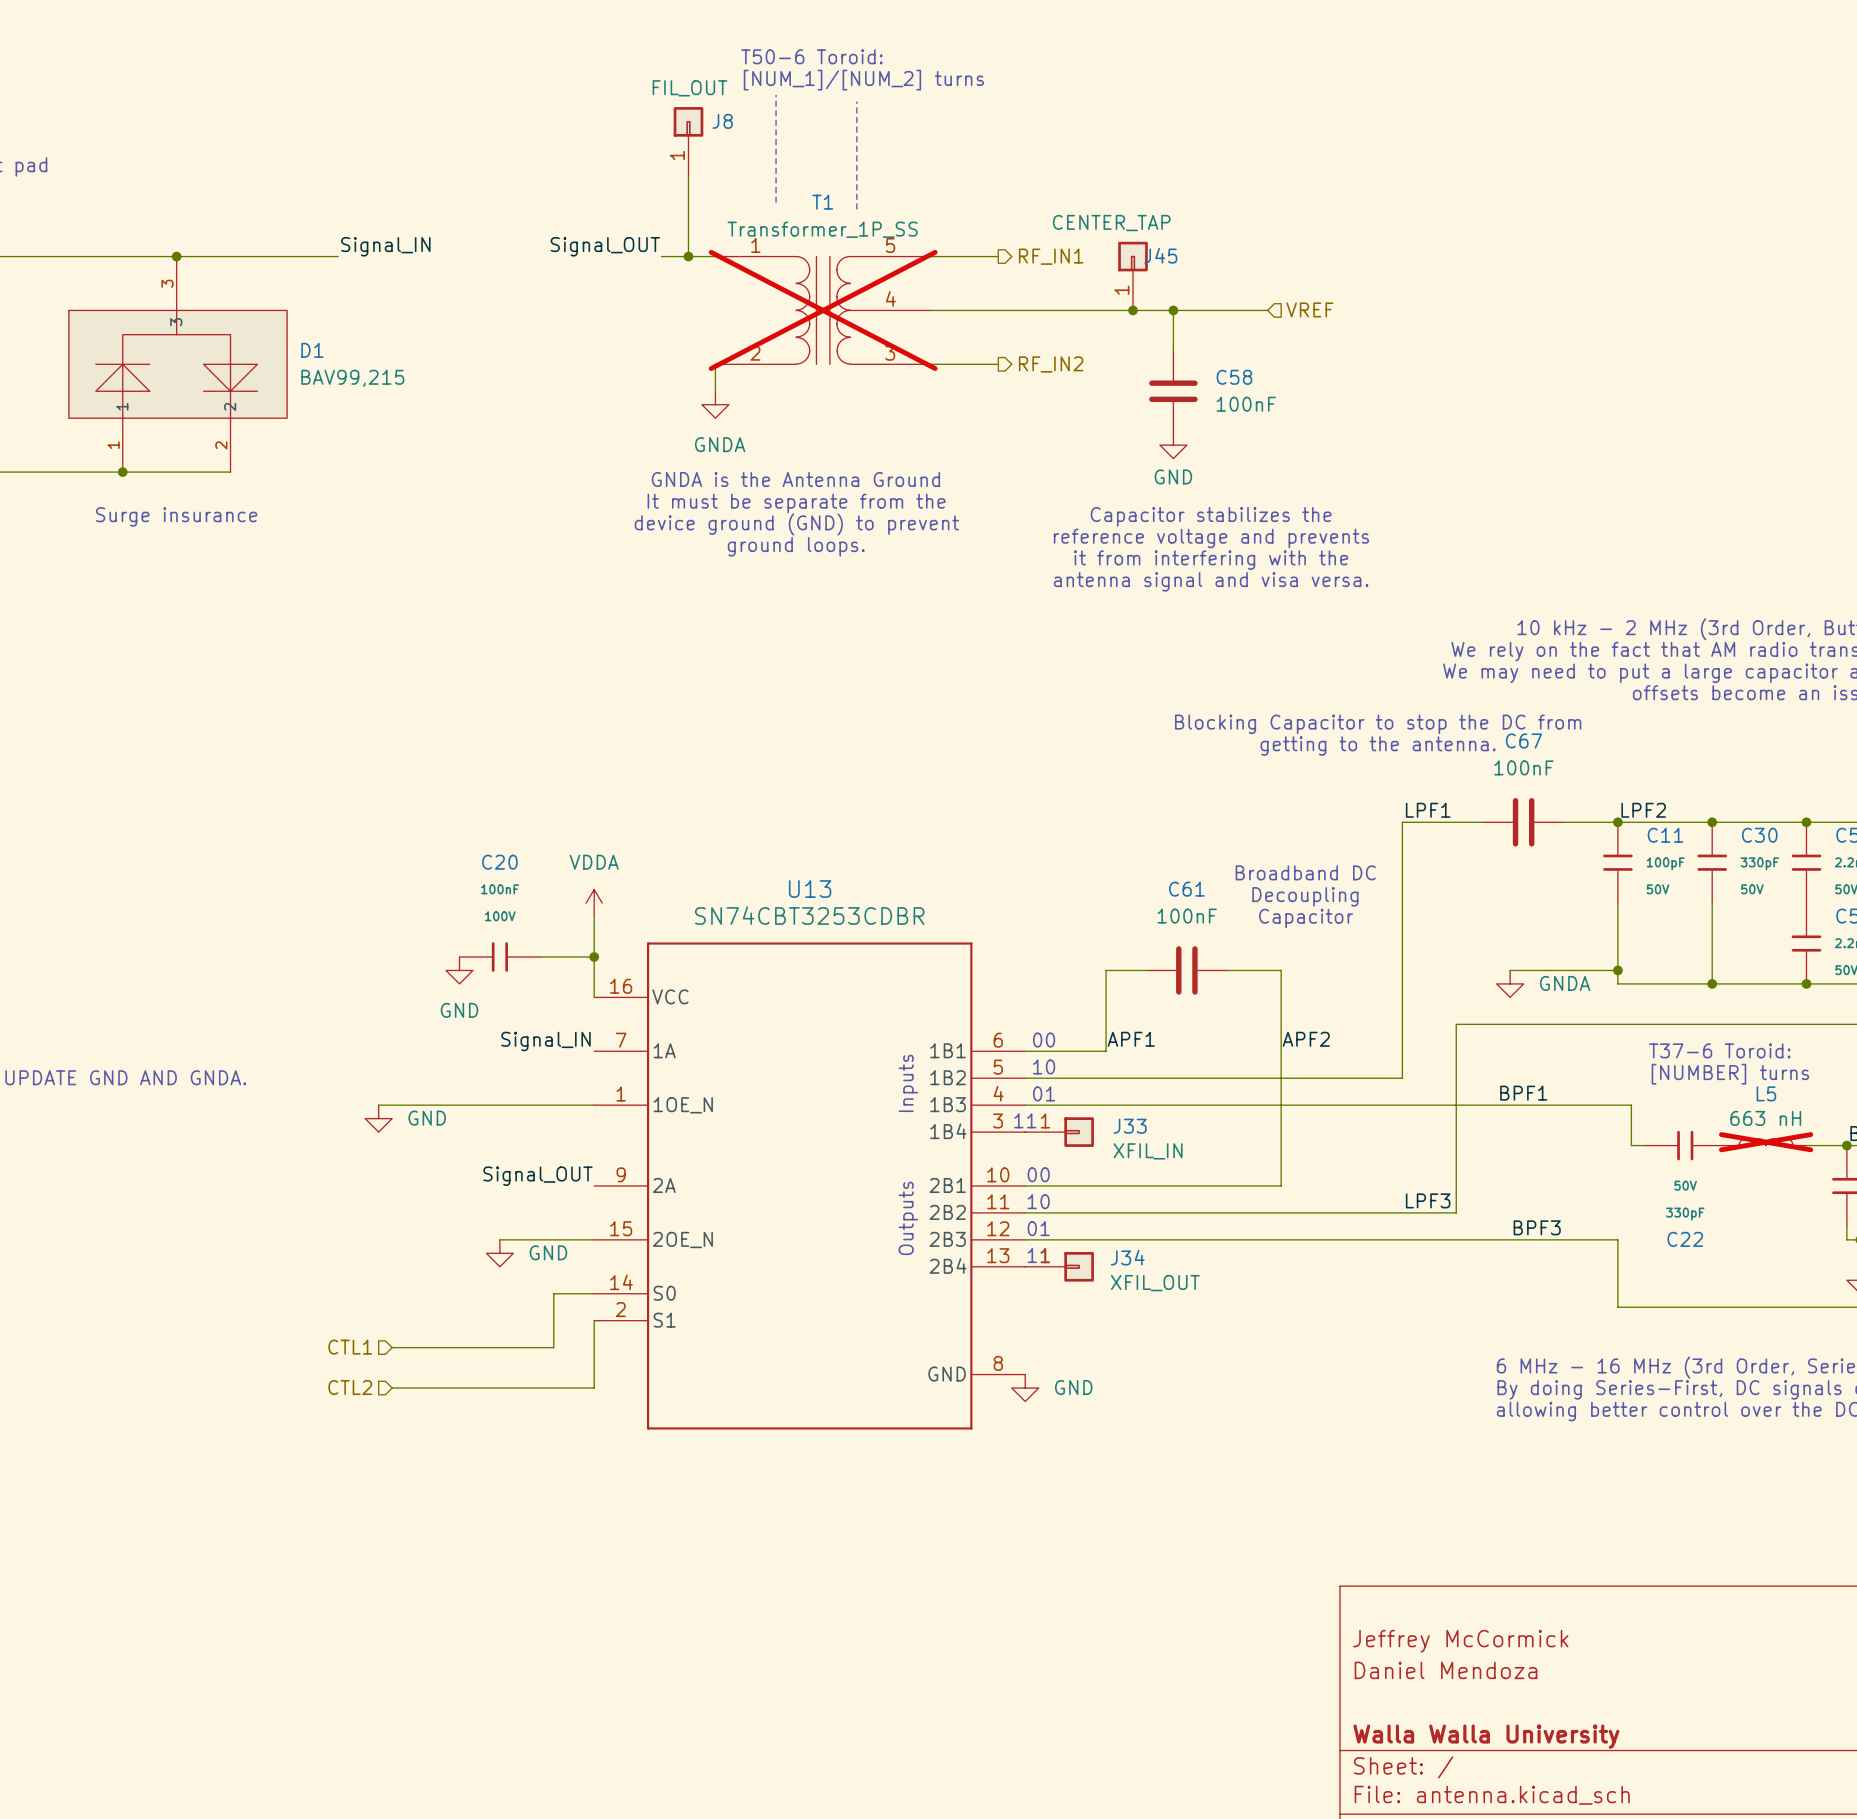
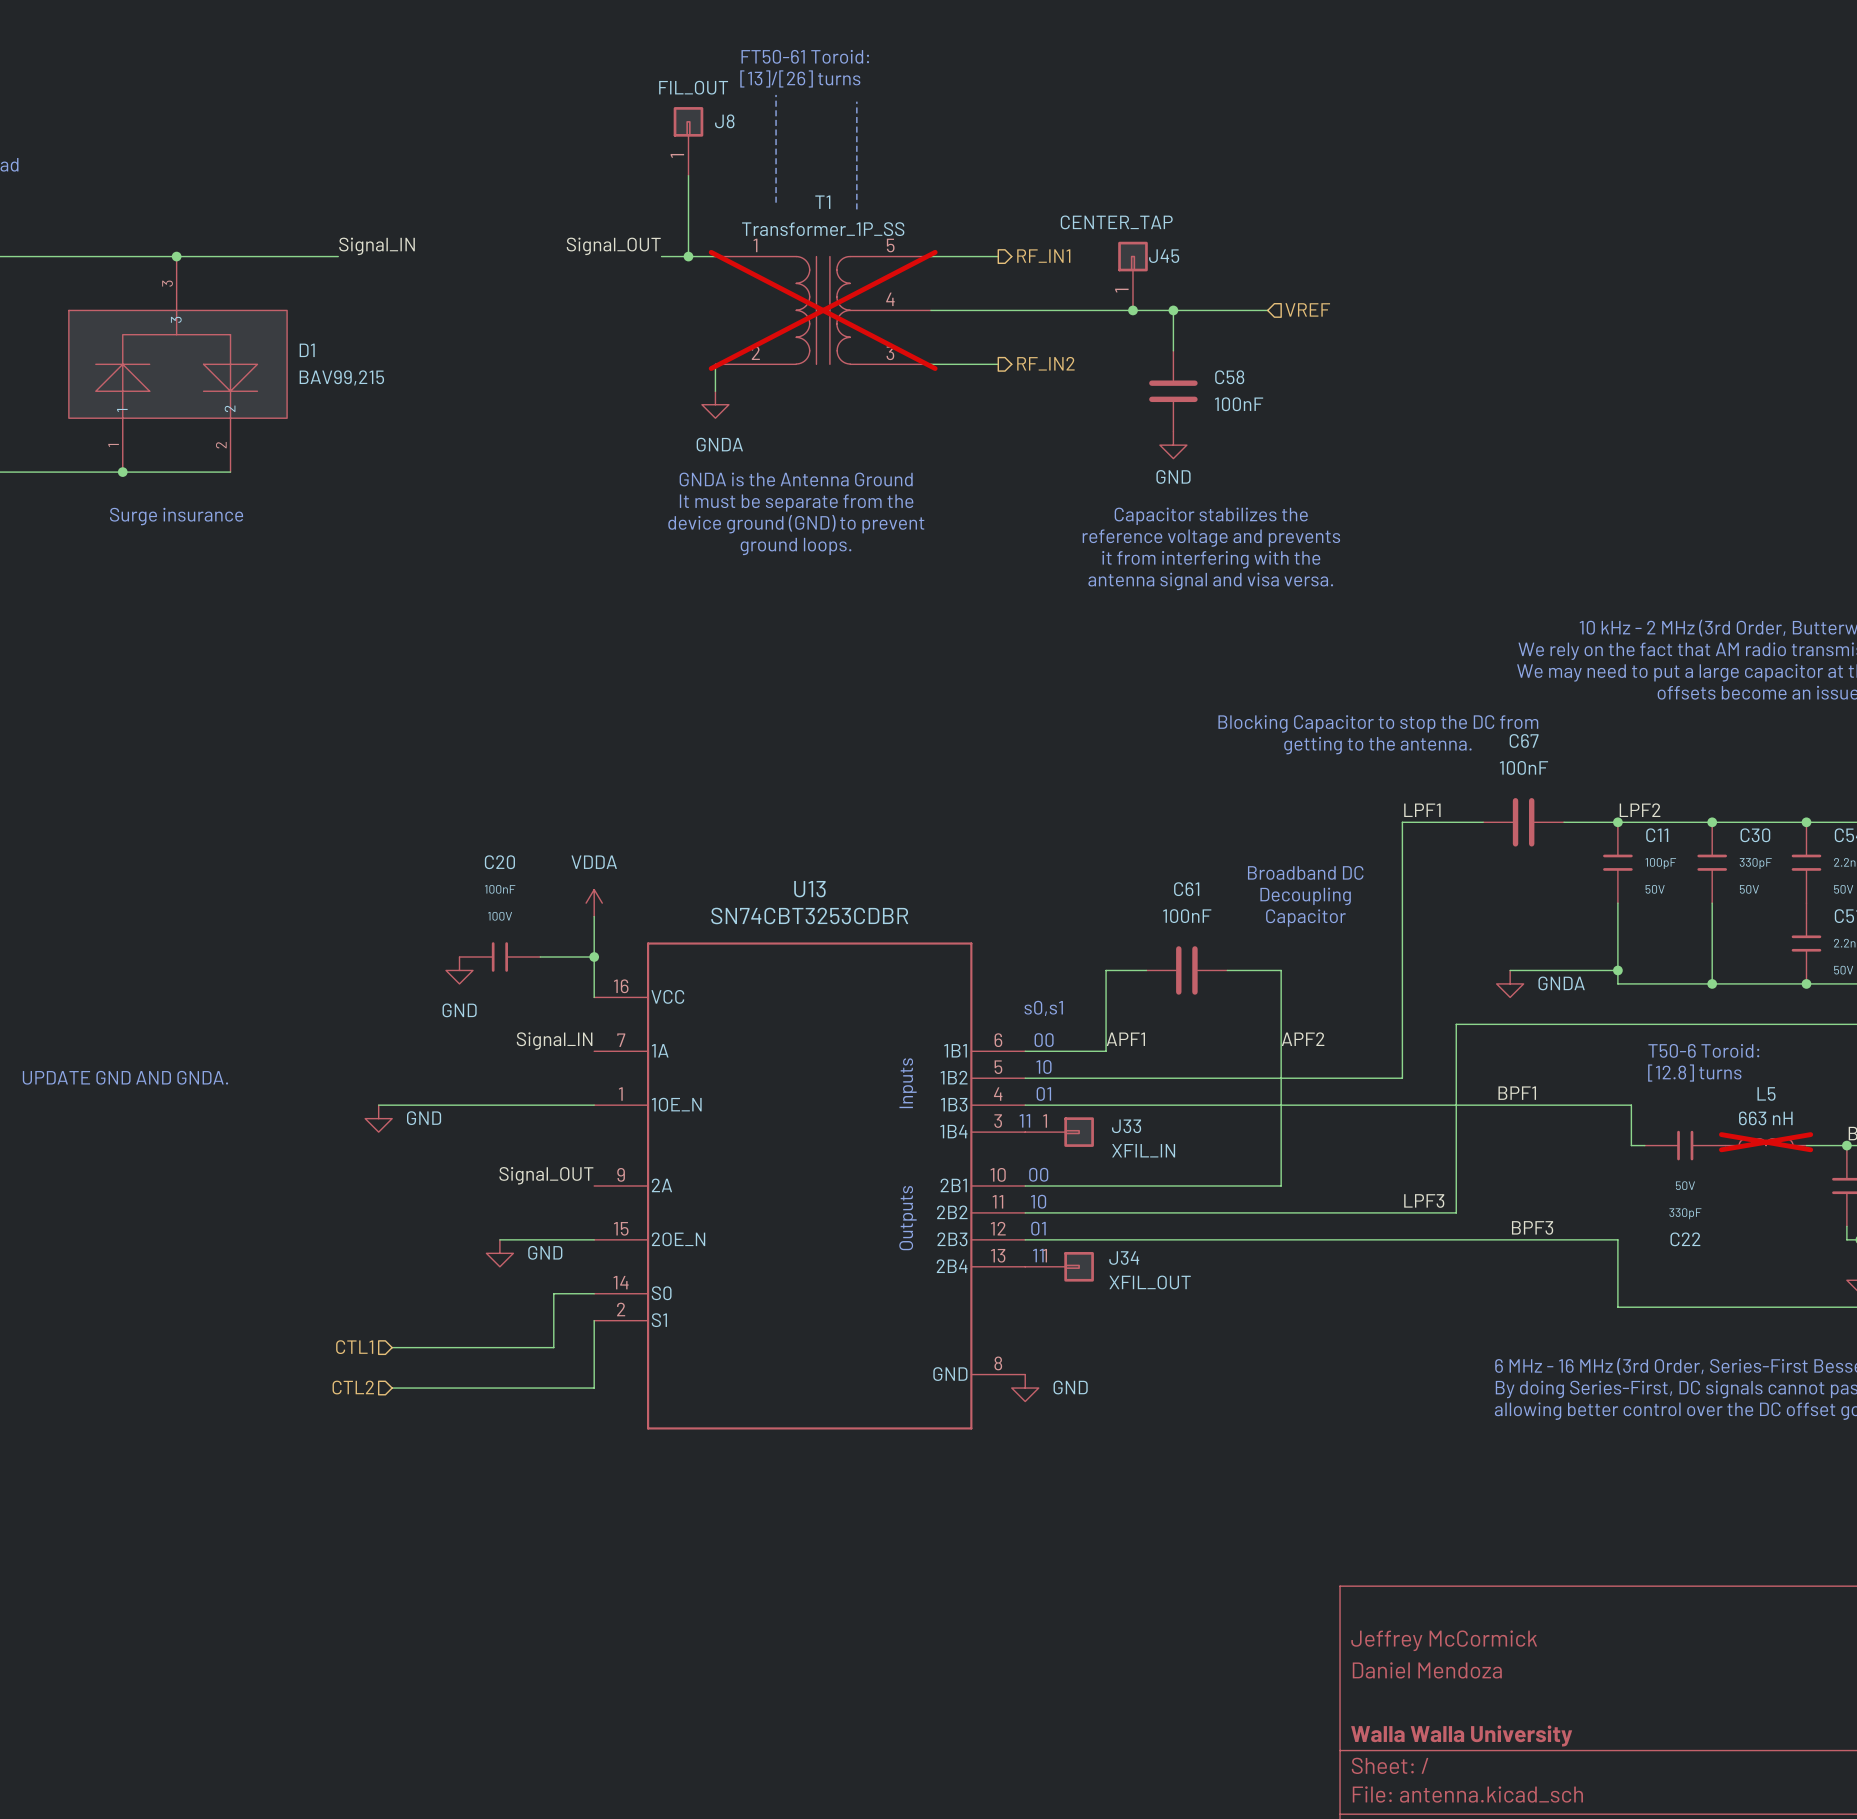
text: T50-6 Toroid: (811, 56) -> FT50-61 Toroid: (805, 56)
text: [NUM_1]/[NUM_2] turns (863, 80) -> [13]/[26] turns (800, 78)
text: none -> s0,s1 (1043, 1008)
text: T37-6 Toroid: (1719, 1050) -> T50-6 Toroid: (1703, 1050)
text: [NUMBER] turns (1730, 1074) -> [12.8] turns (1694, 1073)

